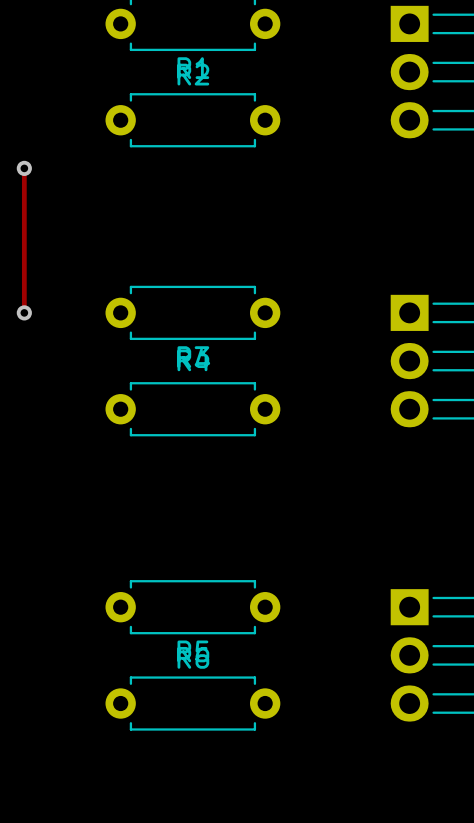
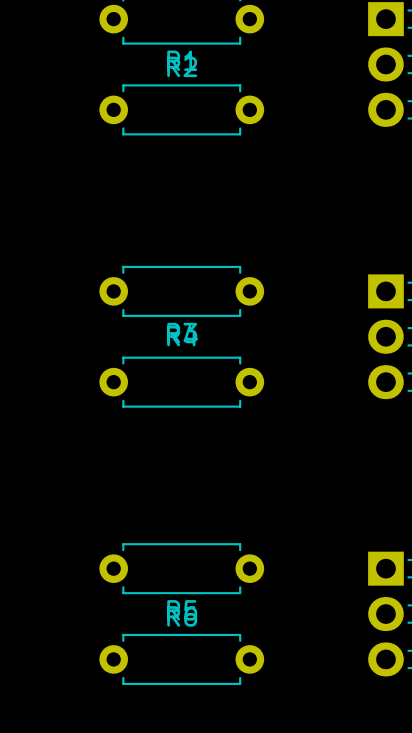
track: (24, 168) (24, 312) -> none
via: (24, 168) -> none
via: (24, 312) -> none

